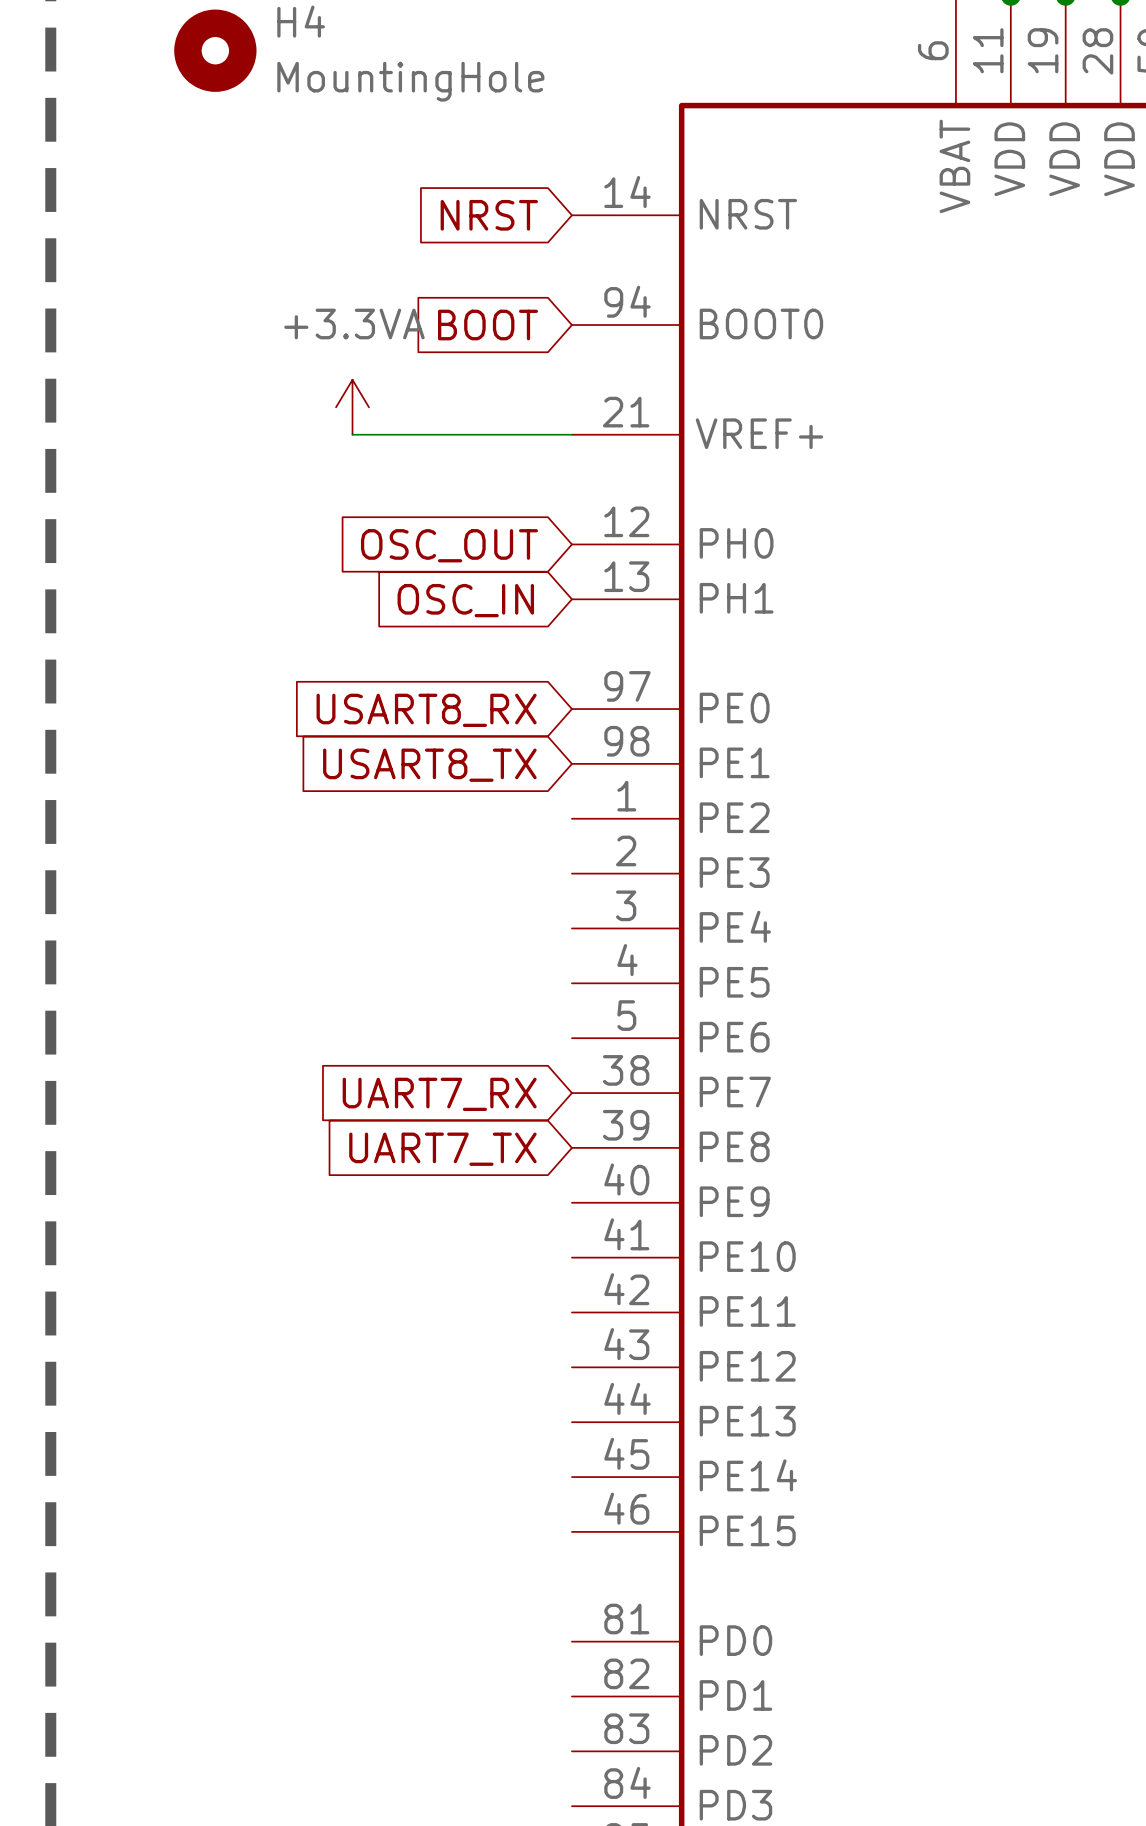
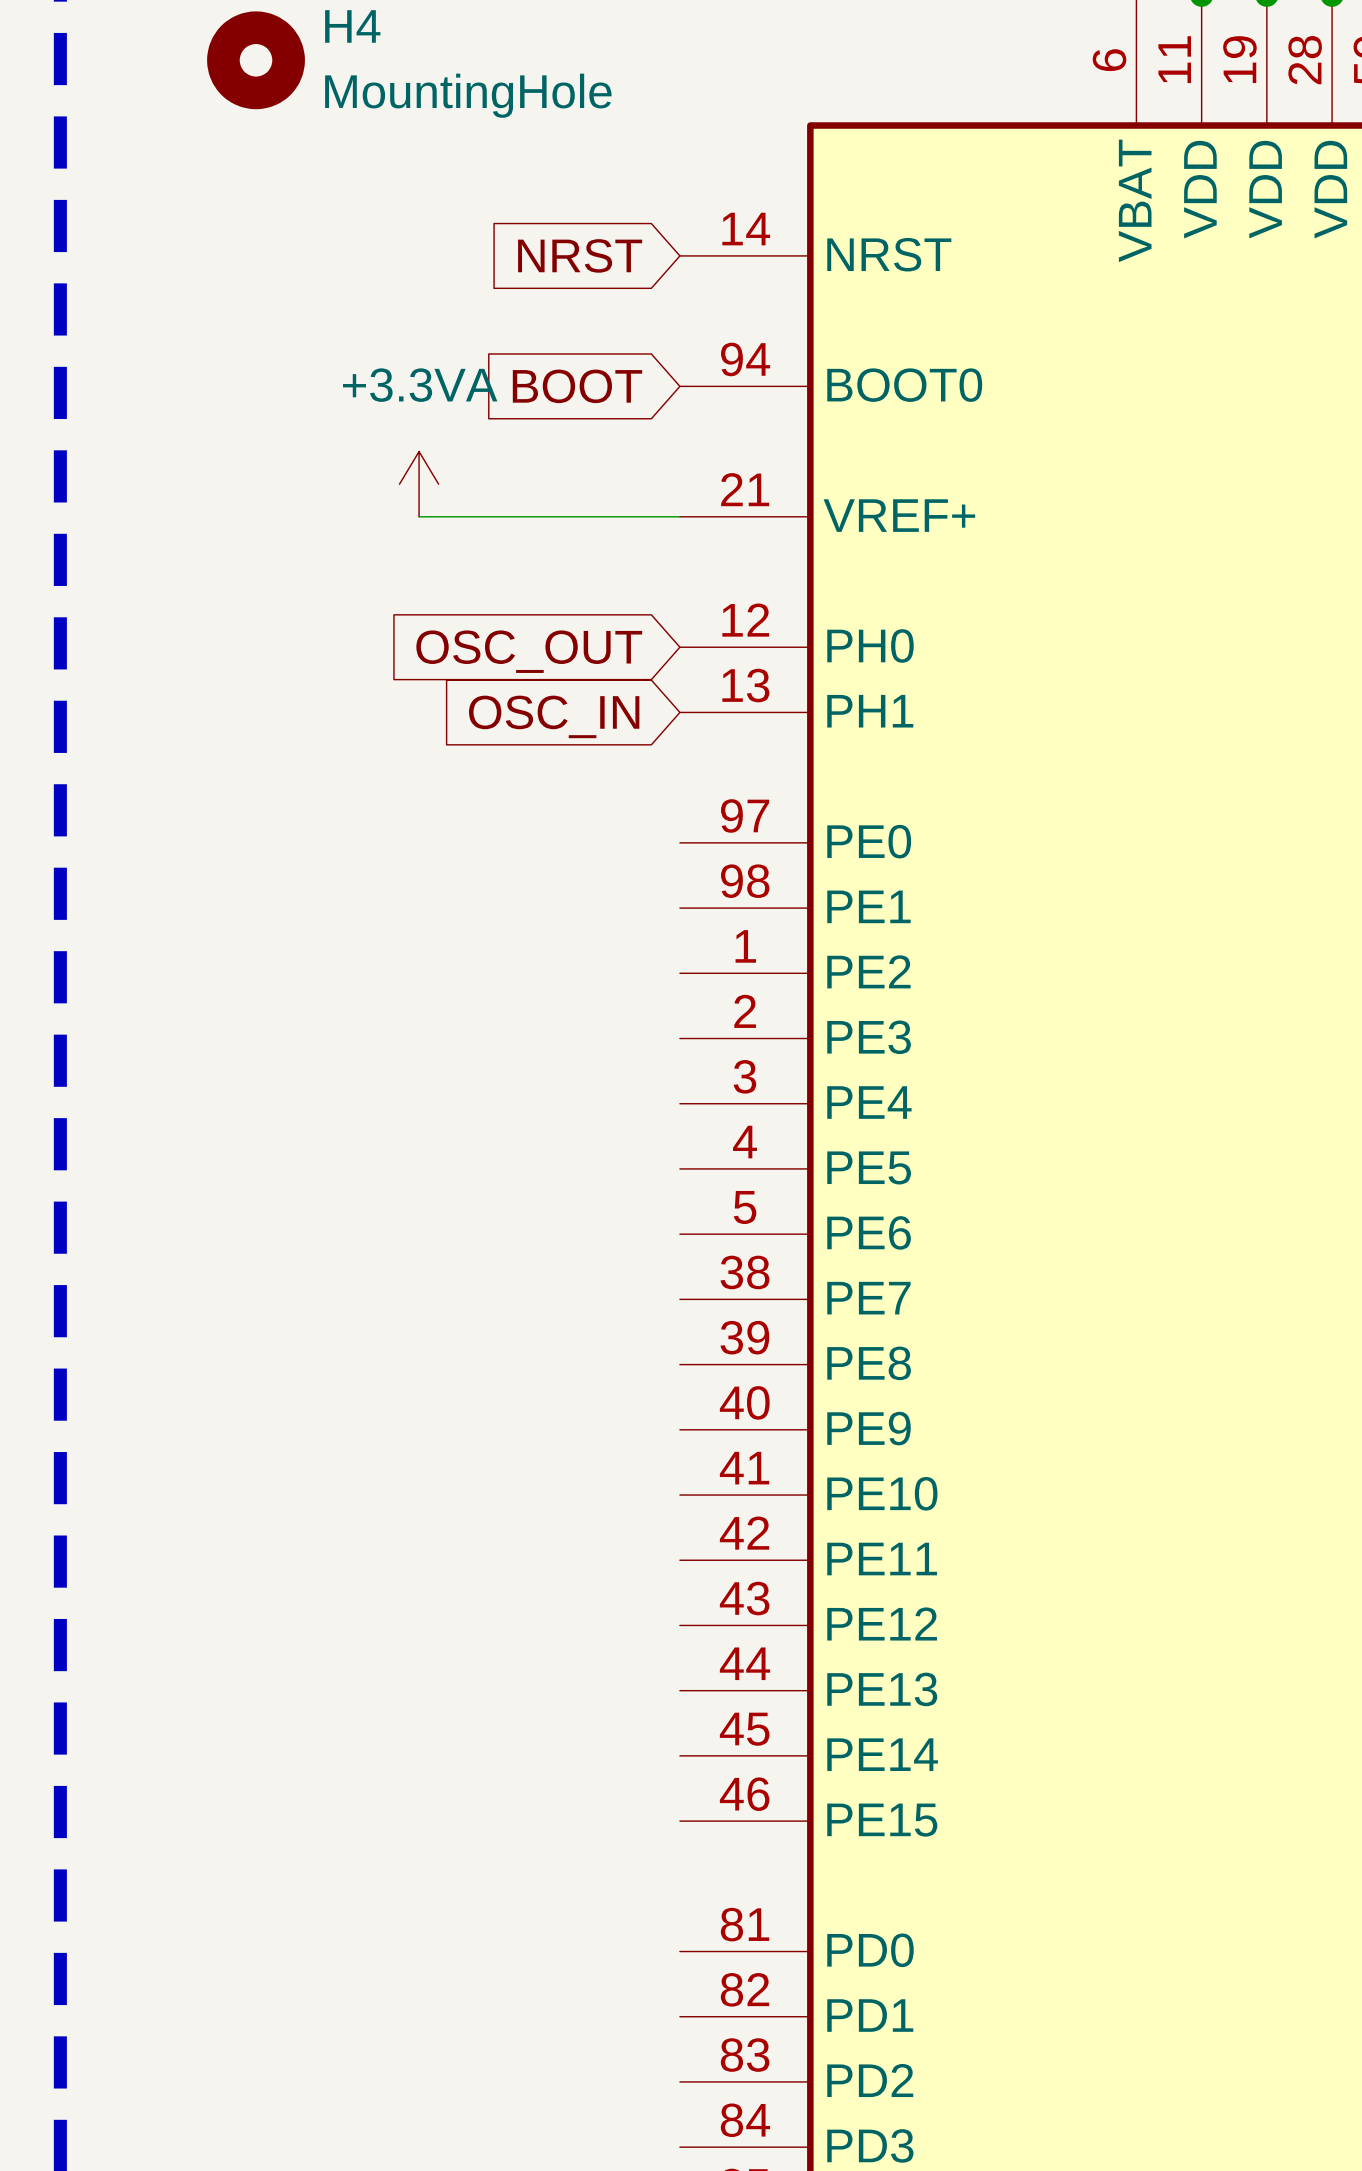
global label: USART8_RX (426, 710) -> none
global label: USART8_TX (429, 765) -> none
global label: UART7_RX (439, 1094) -> none
global label: UART7_TX (442, 1149) -> none

